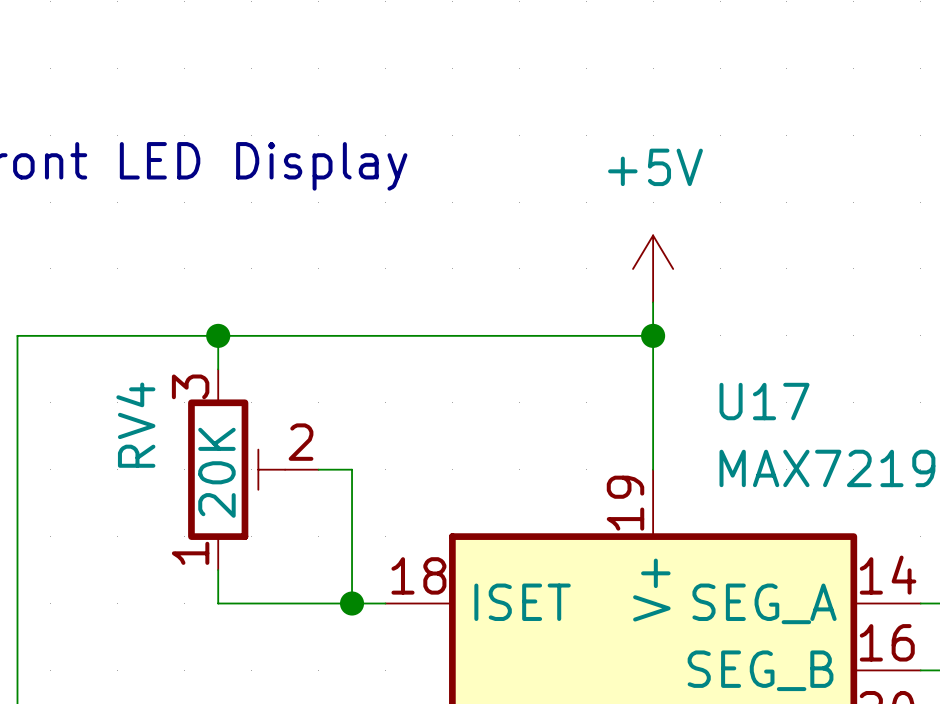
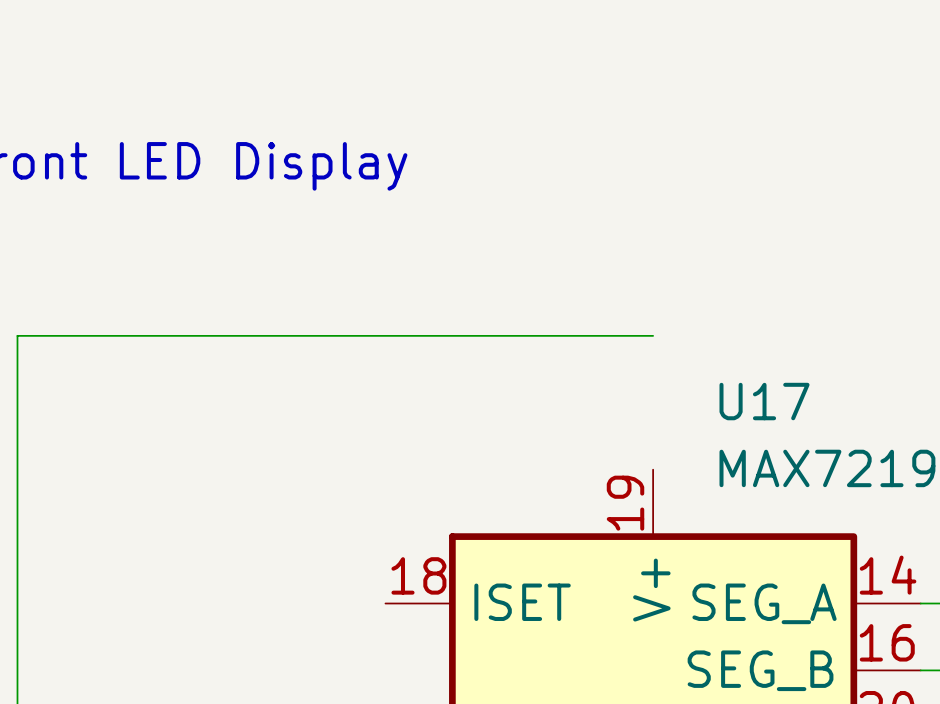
power symbol: +5V (653, 268) -> none
wire: (653, 302) (653, 469) -> none
wire: (218, 335) (218, 369) -> none
junction: (218, 335) -> none
junction: (653, 335) -> none
RV4: 20K (253, 469) -> none
wire: (318, 469) (352, 469) (352, 603) -> none
wire: (218, 570) (218, 603) (385, 603) -> none
junction: (352, 603) -> none

